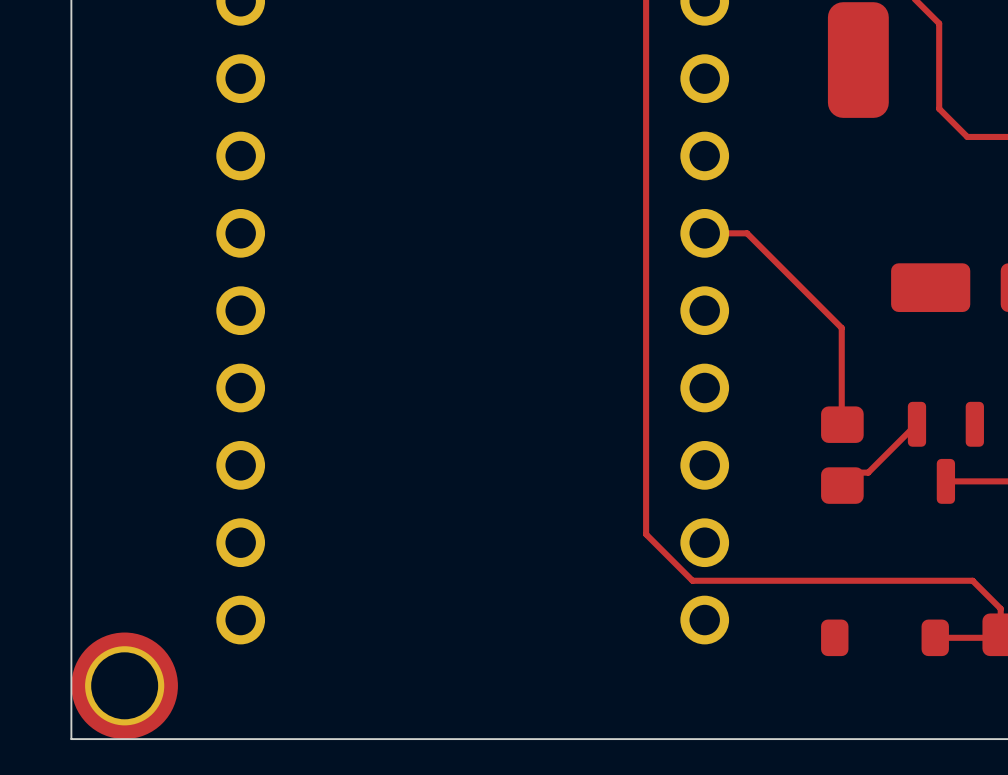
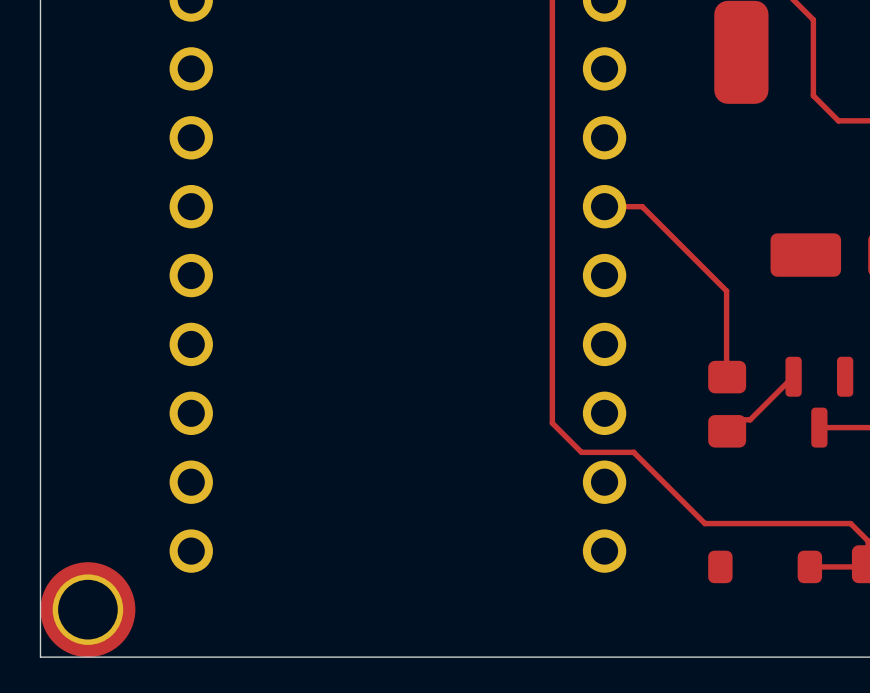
top track: (646, 476) (646, 534) (692, 580) (972, 580) (981, 589) -> (552, 423) (581, 452) (633, 452) (704, 523) (850, 523)

